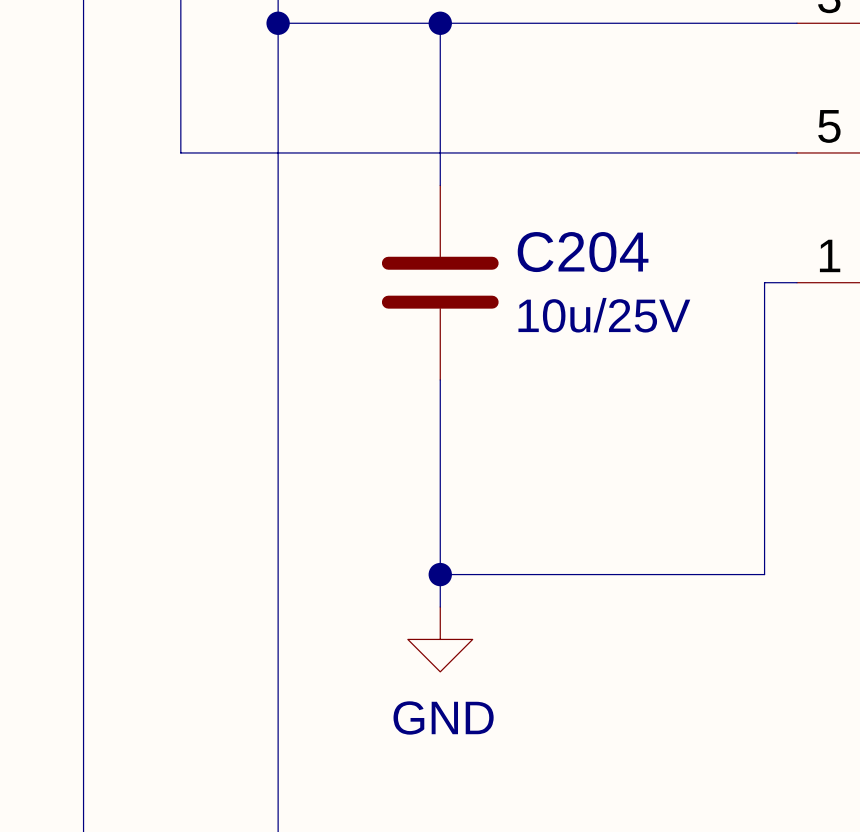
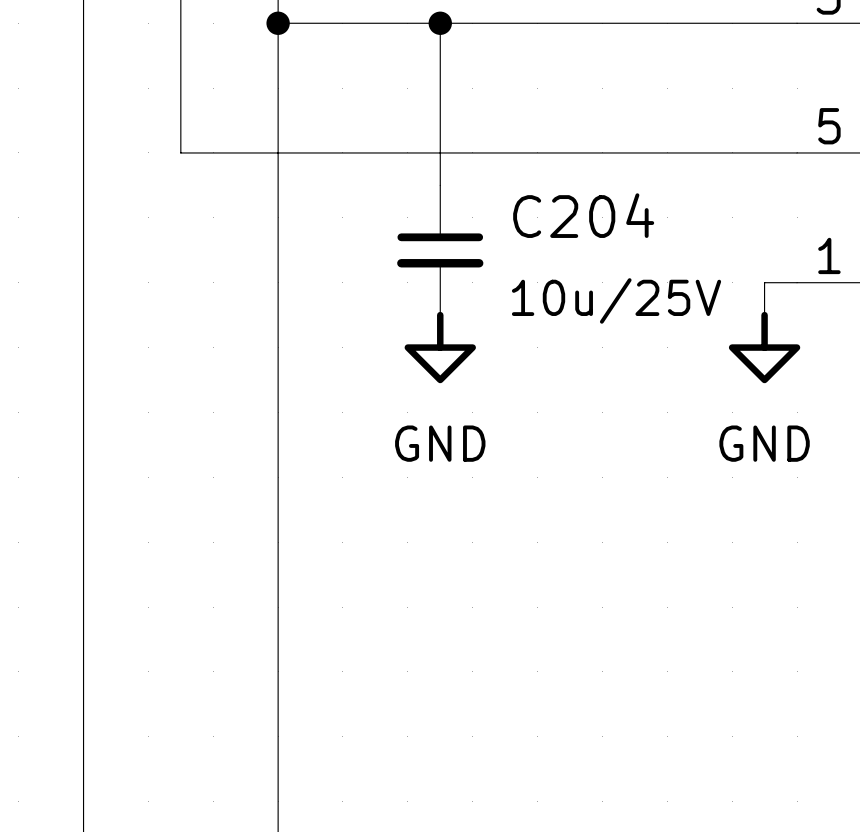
C204 symbol: [381, 185, 499, 380] -> [397, 185, 484, 316]
wire: (764, 315) (764, 574) (440, 574) -> none
power symbol: none -> GND (440, 347)
power symbol: none -> GND (764, 347)
wire: (440, 379) (440, 607) -> none
junction: (440, 574) -> none
power symbol: GND (440, 639) -> none

